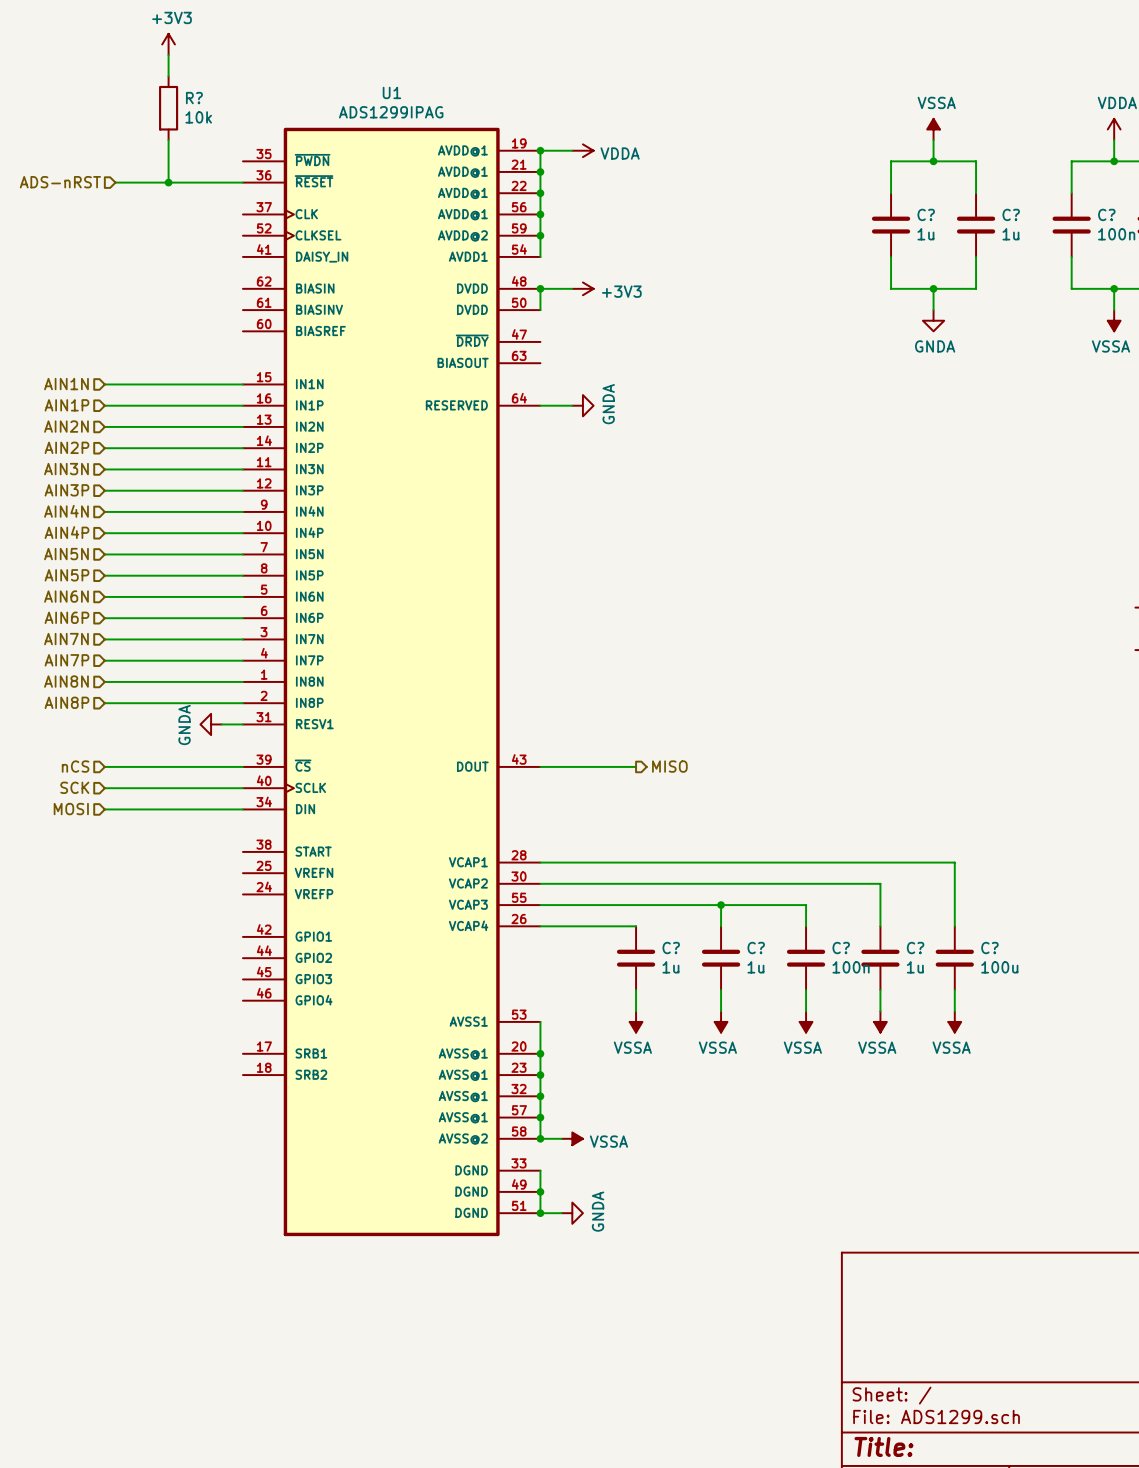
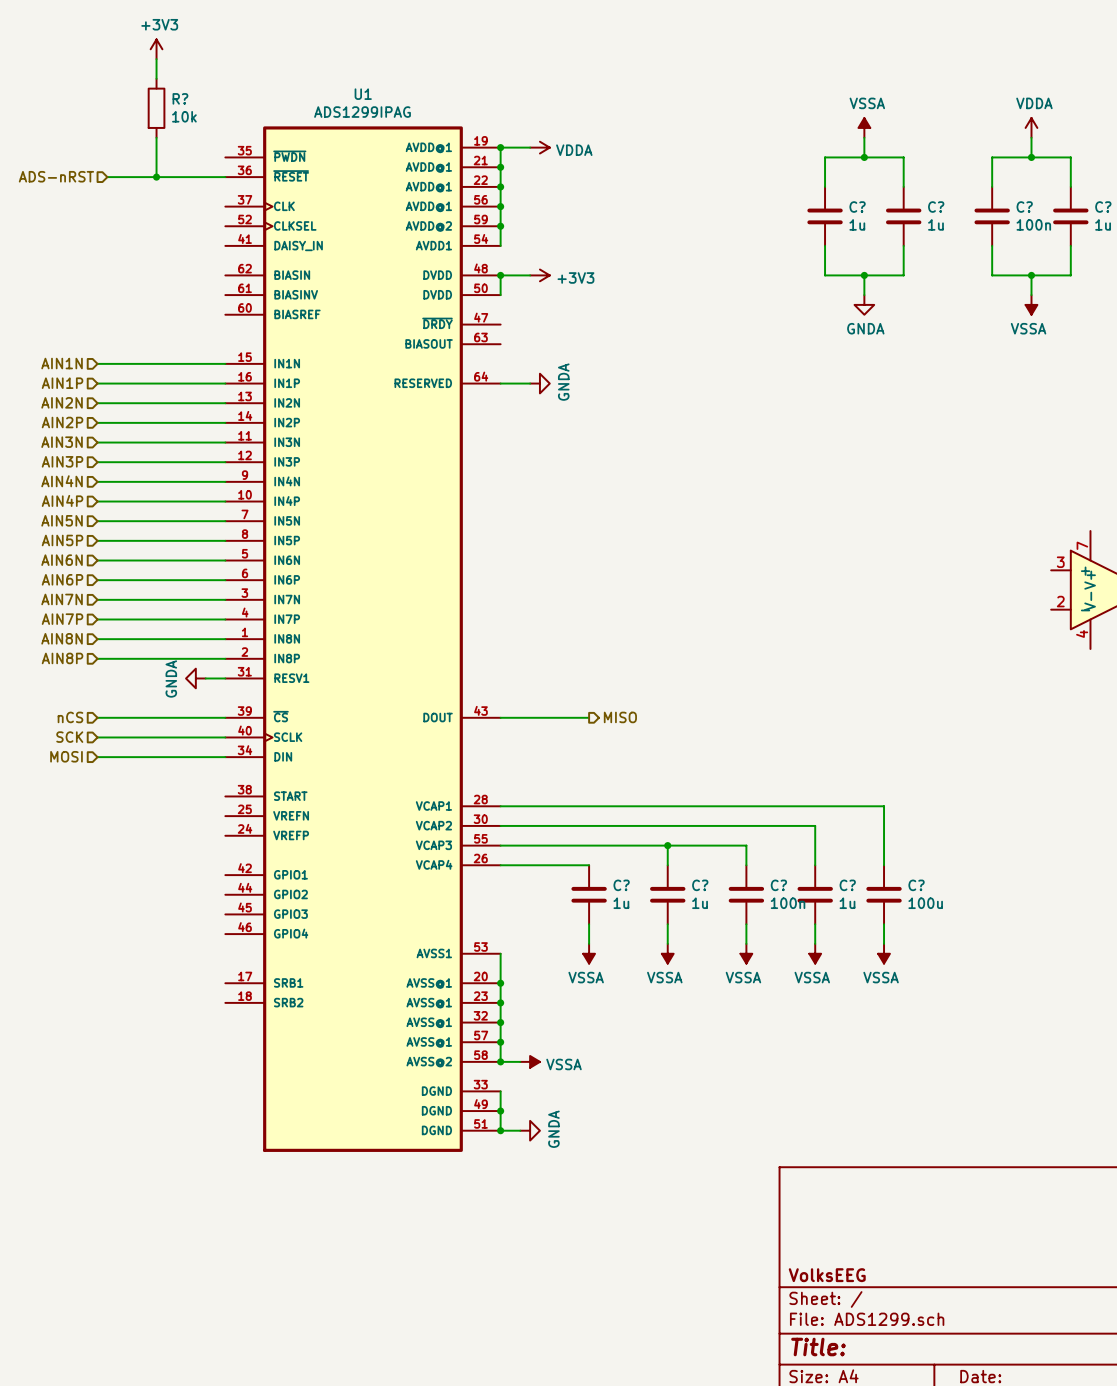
title block: none -> VolksEEG (827, 1275)

